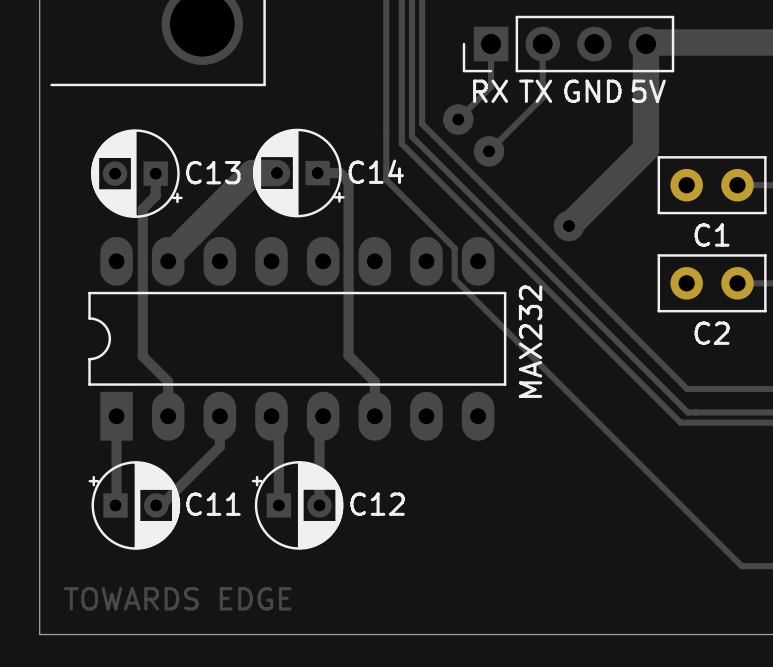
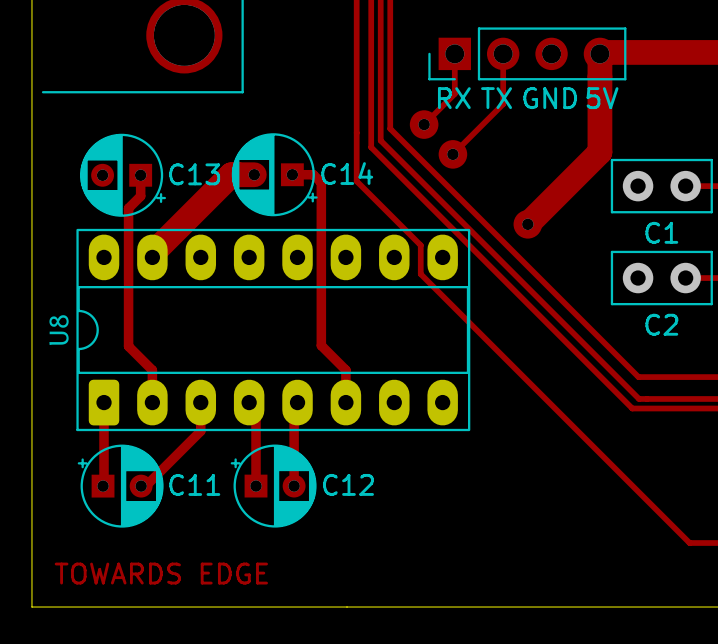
drawing: [100, 236, 495, 286] -> none
via: (116, 261) -> none
via: (168, 261) -> none
via: (219, 261) -> none
via: (271, 261) -> none
via: (323, 261) -> none
via: (374, 261) -> none
via: (426, 261) -> none
via: (478, 261) -> none
line: (540, 287) (540, 299) (526, 287) (520, 290) (522, 298) -> none
line: (89, 293) (89, 318) (97, 320) (103, 324) (108, 331) (109, 338) (108, 346) (103, 353) (97, 357) (89, 359) (89, 384) (505, 384) (505, 293) (89, 293) -> none
line: (520, 318) (520, 306) (528, 313) (530, 307) (538, 307) (540, 310) (538, 318) -> none
line: (540, 325) (540, 338) (526, 325) (520, 329) (522, 337) -> none
U8: none -> (273, 329)
line: (520, 344) (540, 357) -> none
line: (540, 344) (520, 357) -> none
line: (540, 362) (520, 369) (540, 376) -> none
line: (534, 364) (534, 374) -> none
line: (540, 382) (520, 382) (534, 389) (520, 396) (540, 396) -> none
drawing: [100, 391, 495, 441] -> none
via: (116, 416) -> none
via: (168, 416) -> none
via: (219, 416) -> none
via: (271, 416) -> none
via: (323, 416) -> none
via: (374, 416) -> none
via: (426, 416) -> none
via: (478, 416) -> none

